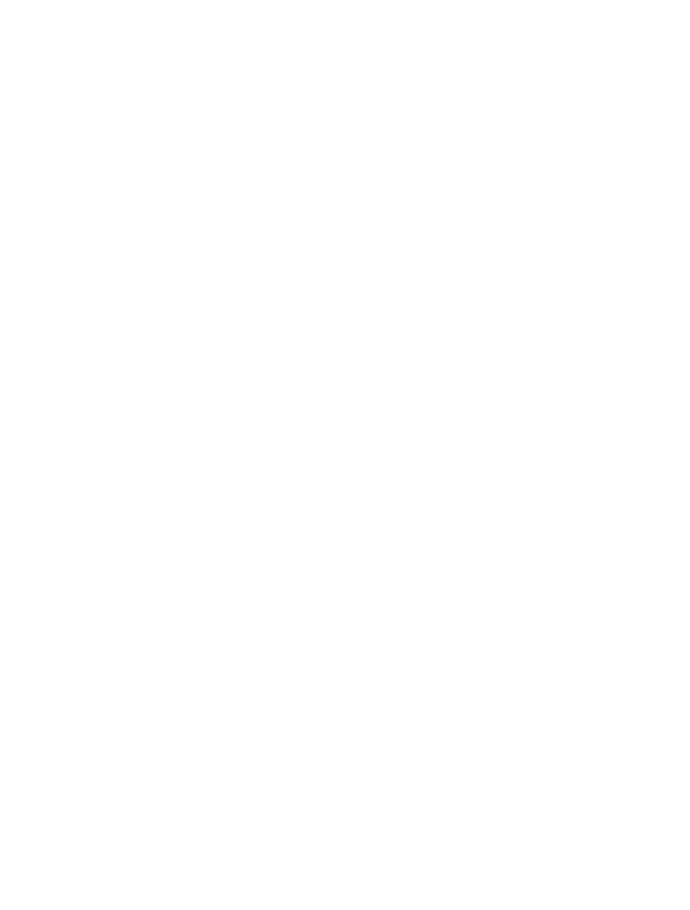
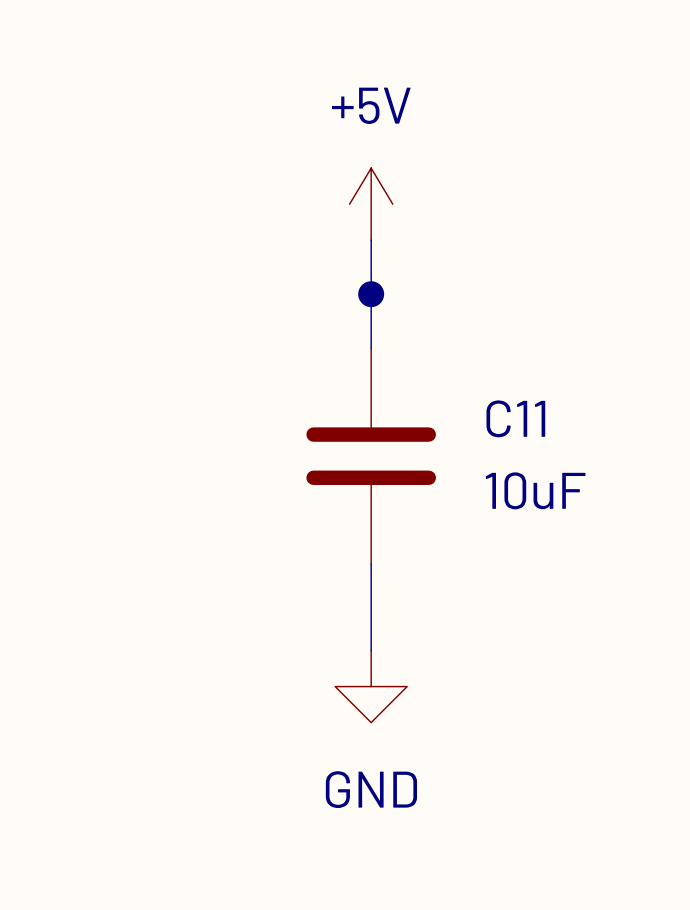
power symbol: none -> +5V (371, 204)
wire: none -> (371, 240) (371, 348)
junction: none -> (371, 294)
C11: none -> 10uF (371, 456)
wire: none -> (371, 564) (371, 650)
power symbol: none -> GND (371, 686)

